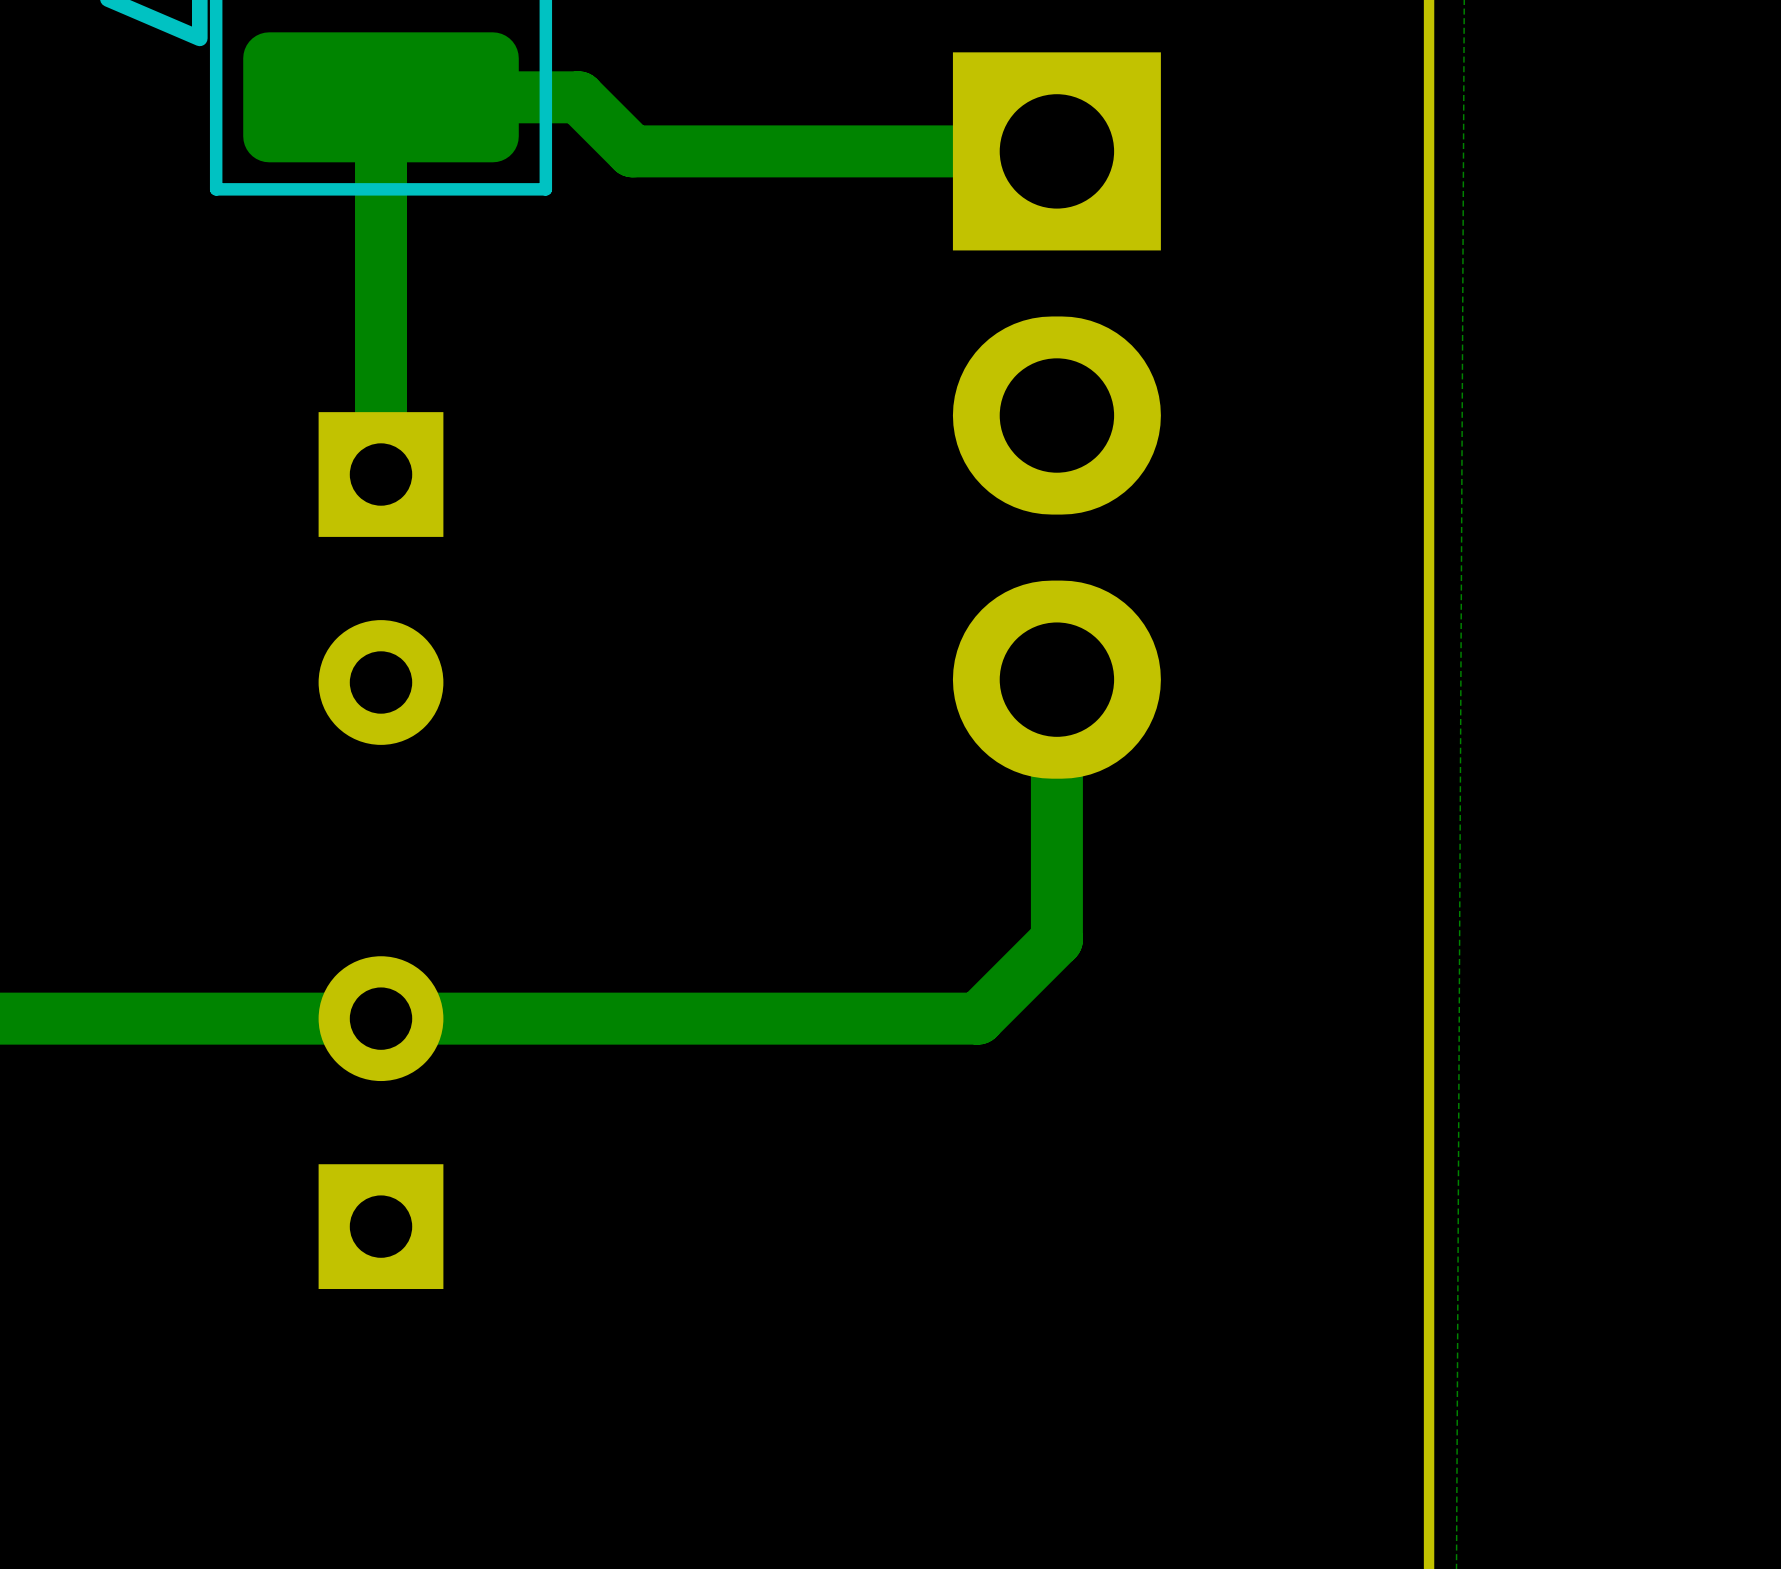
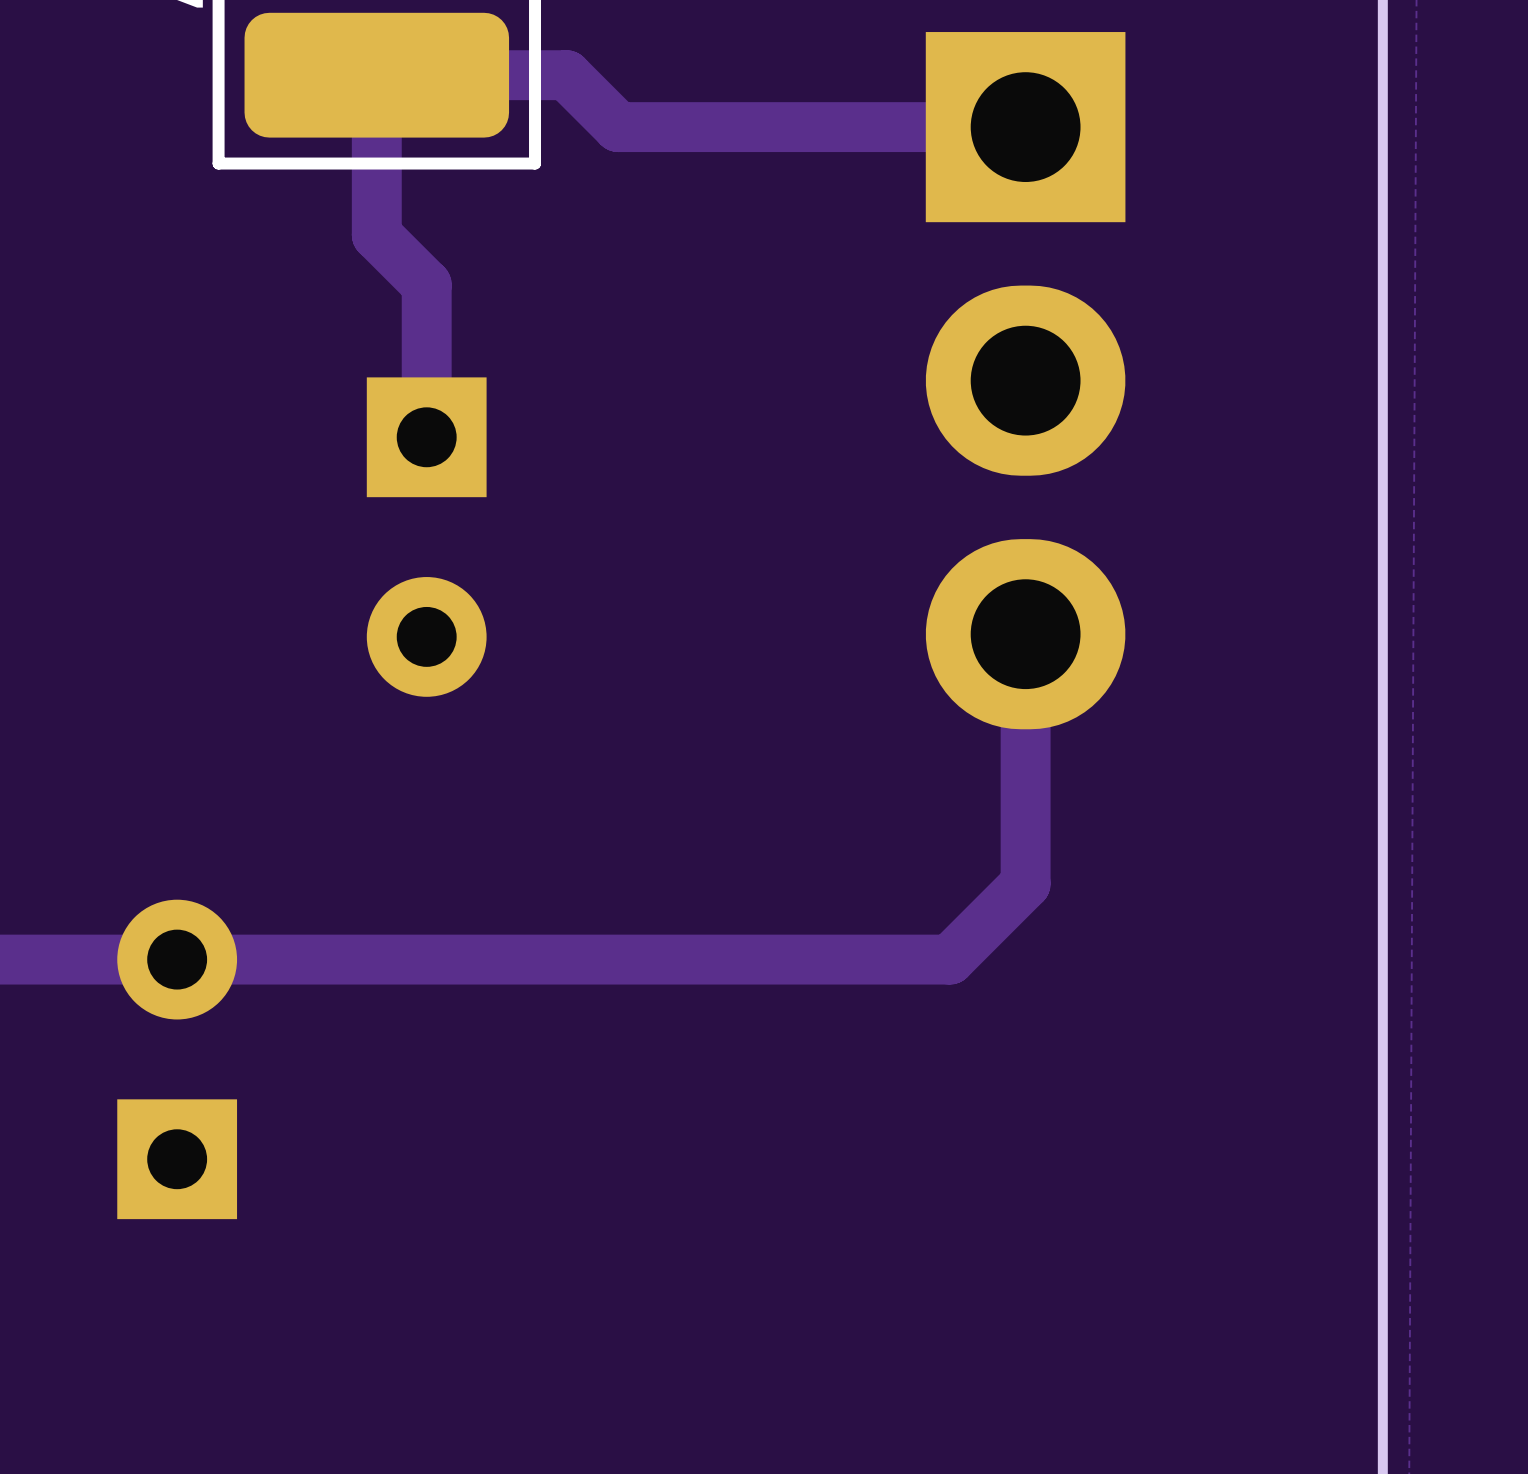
track: (381, 263) (381, 474) -> (376, 234) (426, 284) (426, 437)
part position: (381, 578) -> (426, 537)
part position: (381, 1122) -> (177, 1059)

